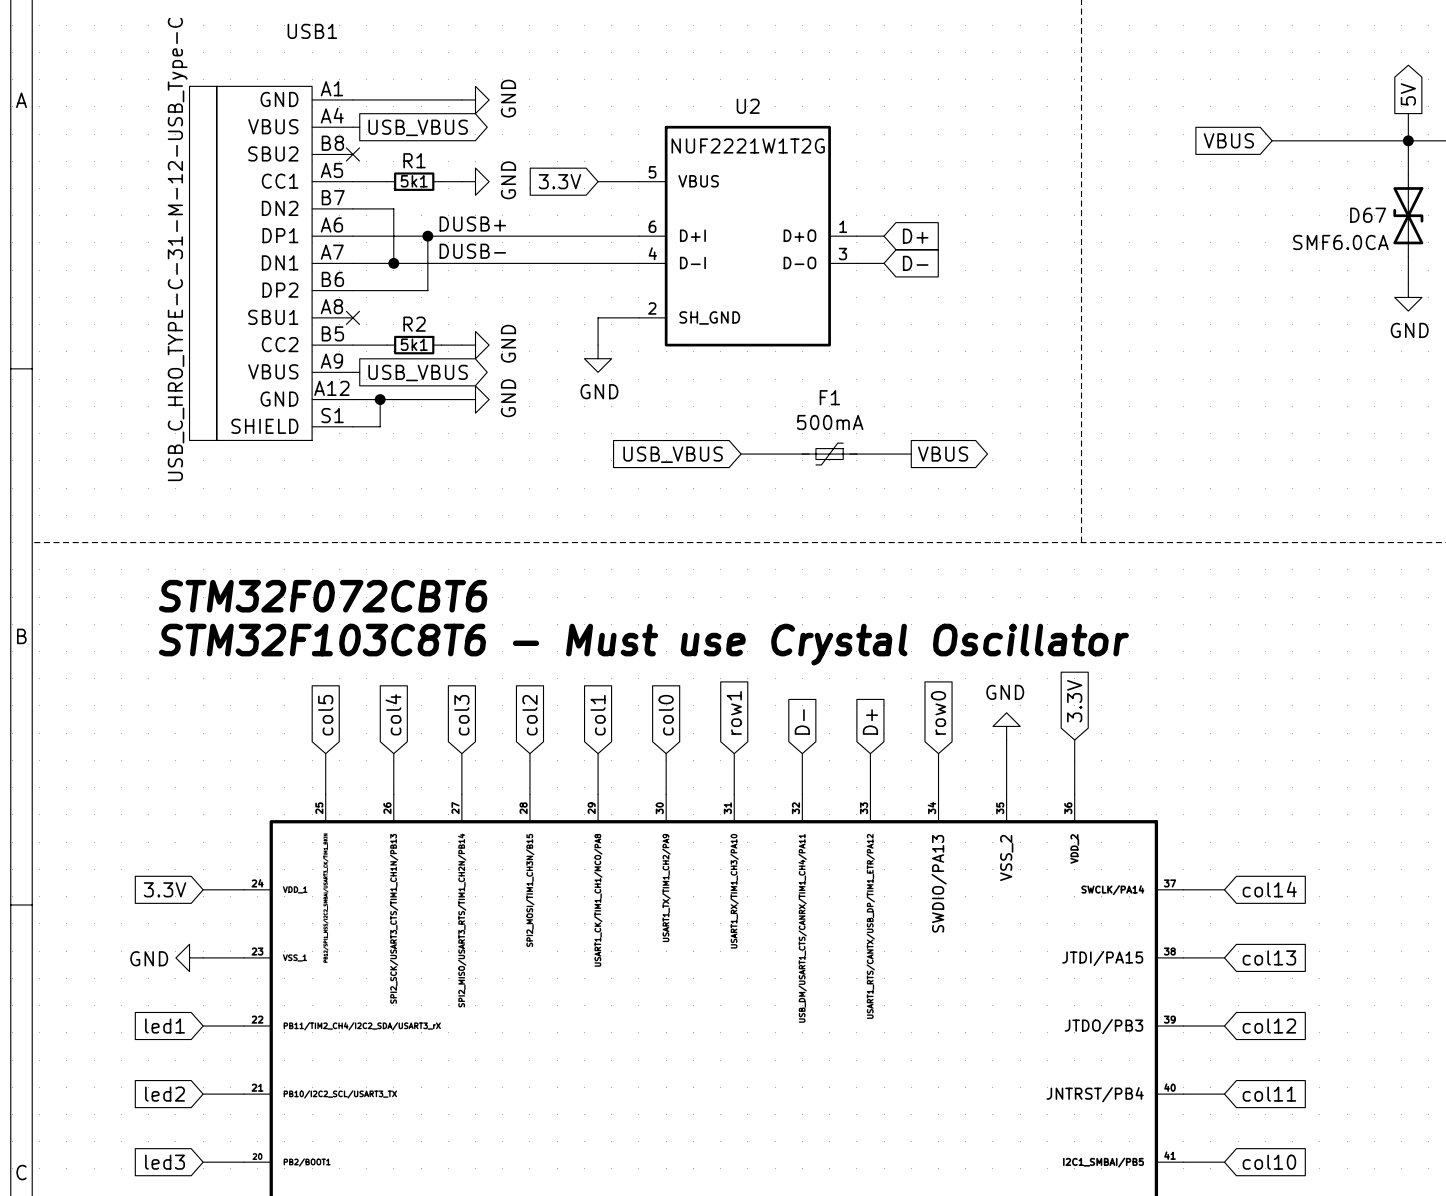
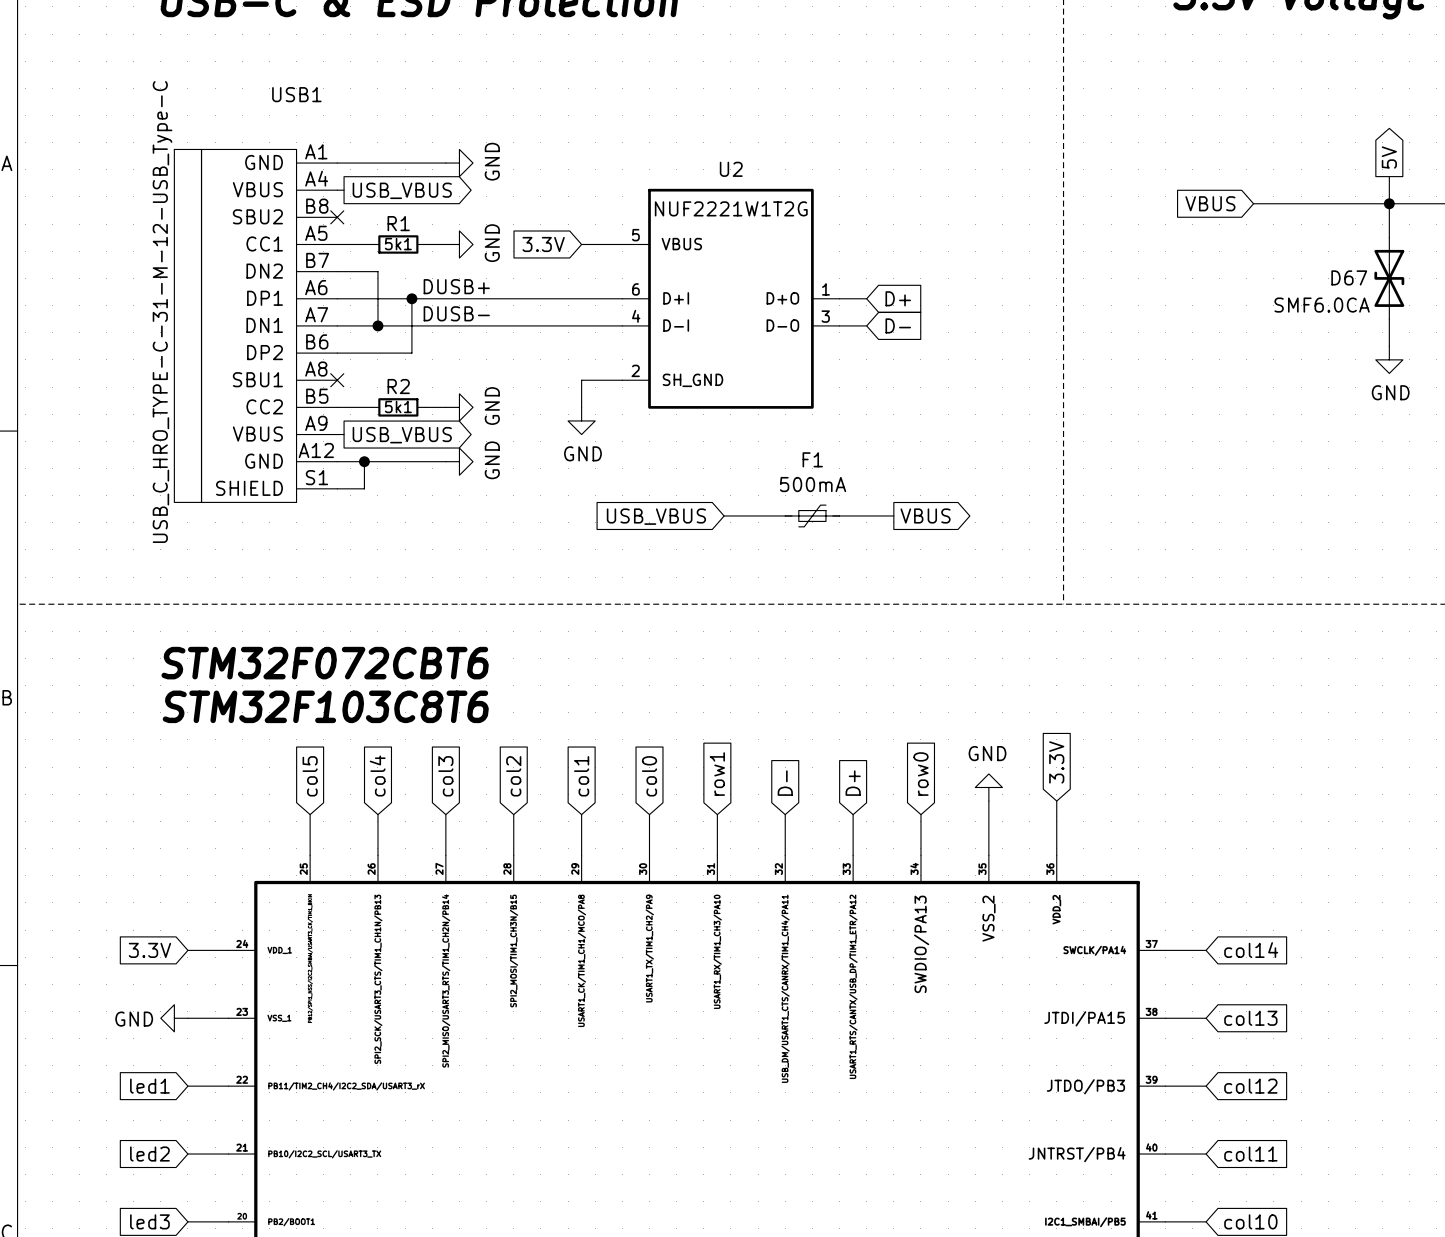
text: STM32F072CBT6 (323, 596) -> none
text: none -> STM32F072CBT6 (325, 663)
text: STM32F103C8T6 - Must use Crystal Oscillator (643, 644) -> none
text: none -> STM32F103C8T6 (325, 706)

